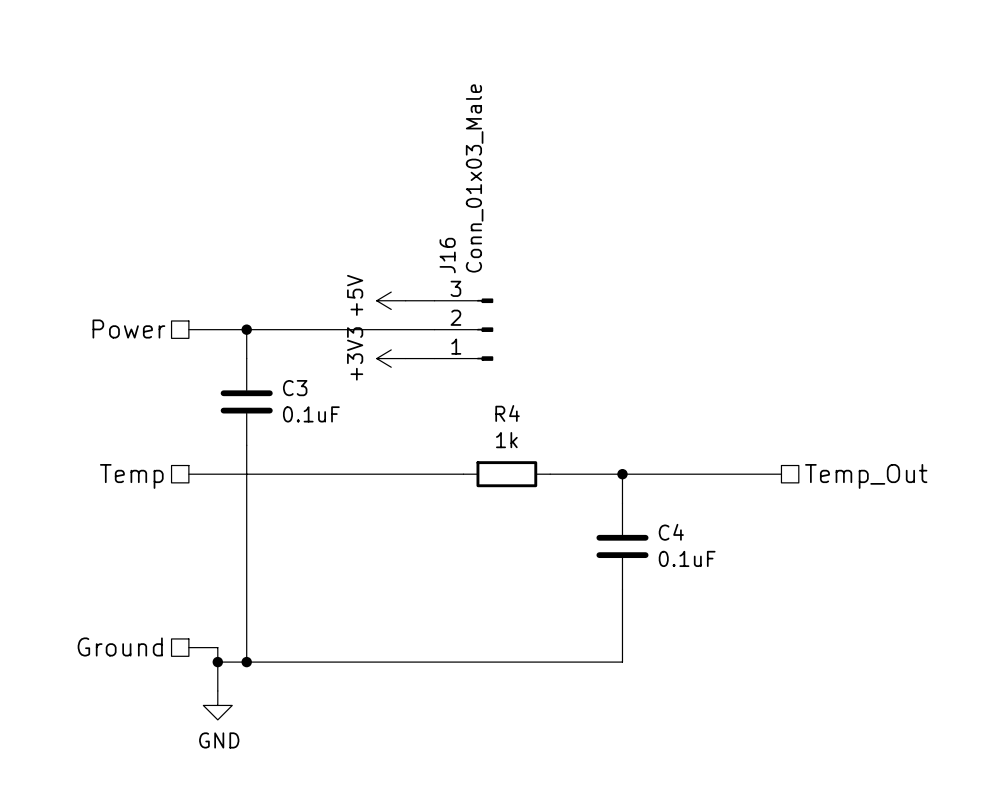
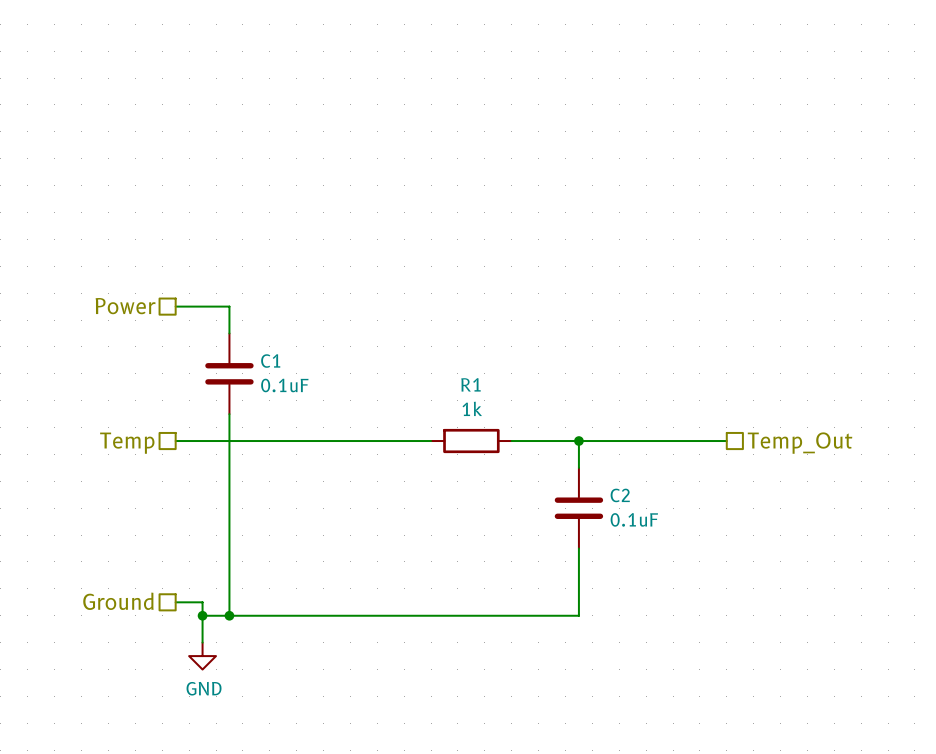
power symbol: +5V (391, 300) -> none
wire: (405, 300) (434, 300) -> none
wire: (246, 329) (434, 329) -> none
junction: (246, 329) -> none
J16: Conn_01x03_Male (463, 329) -> none
power symbol: +3V3 (391, 358) -> none
wire: (405, 358) (434, 358) -> none
C3 name: C3 (295, 388) -> C1 (270, 361)
R4 name: R4 (507, 413) -> R1 (470, 384)
C4 name: C4 (671, 532) -> C2 (620, 495)

